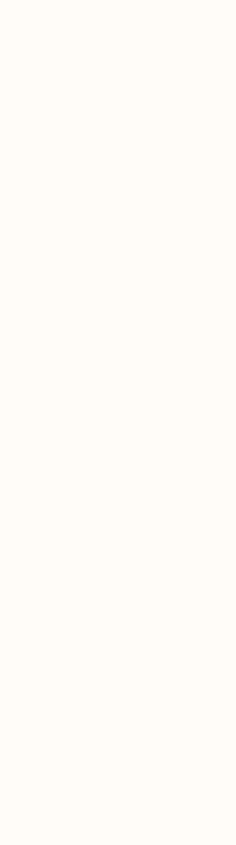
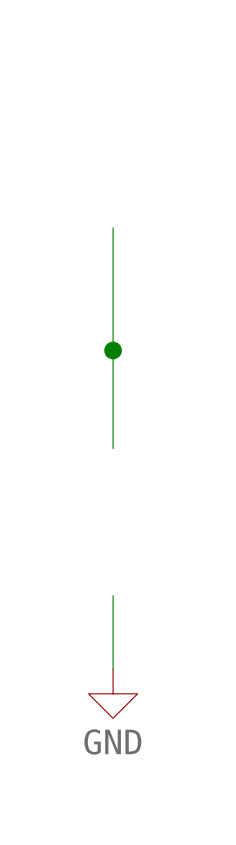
wire: none -> (113, 227) (113, 448)
junction: none -> (113, 350)
wire: none -> (113, 595) (113, 669)
power symbol: none -> GND (113, 693)

